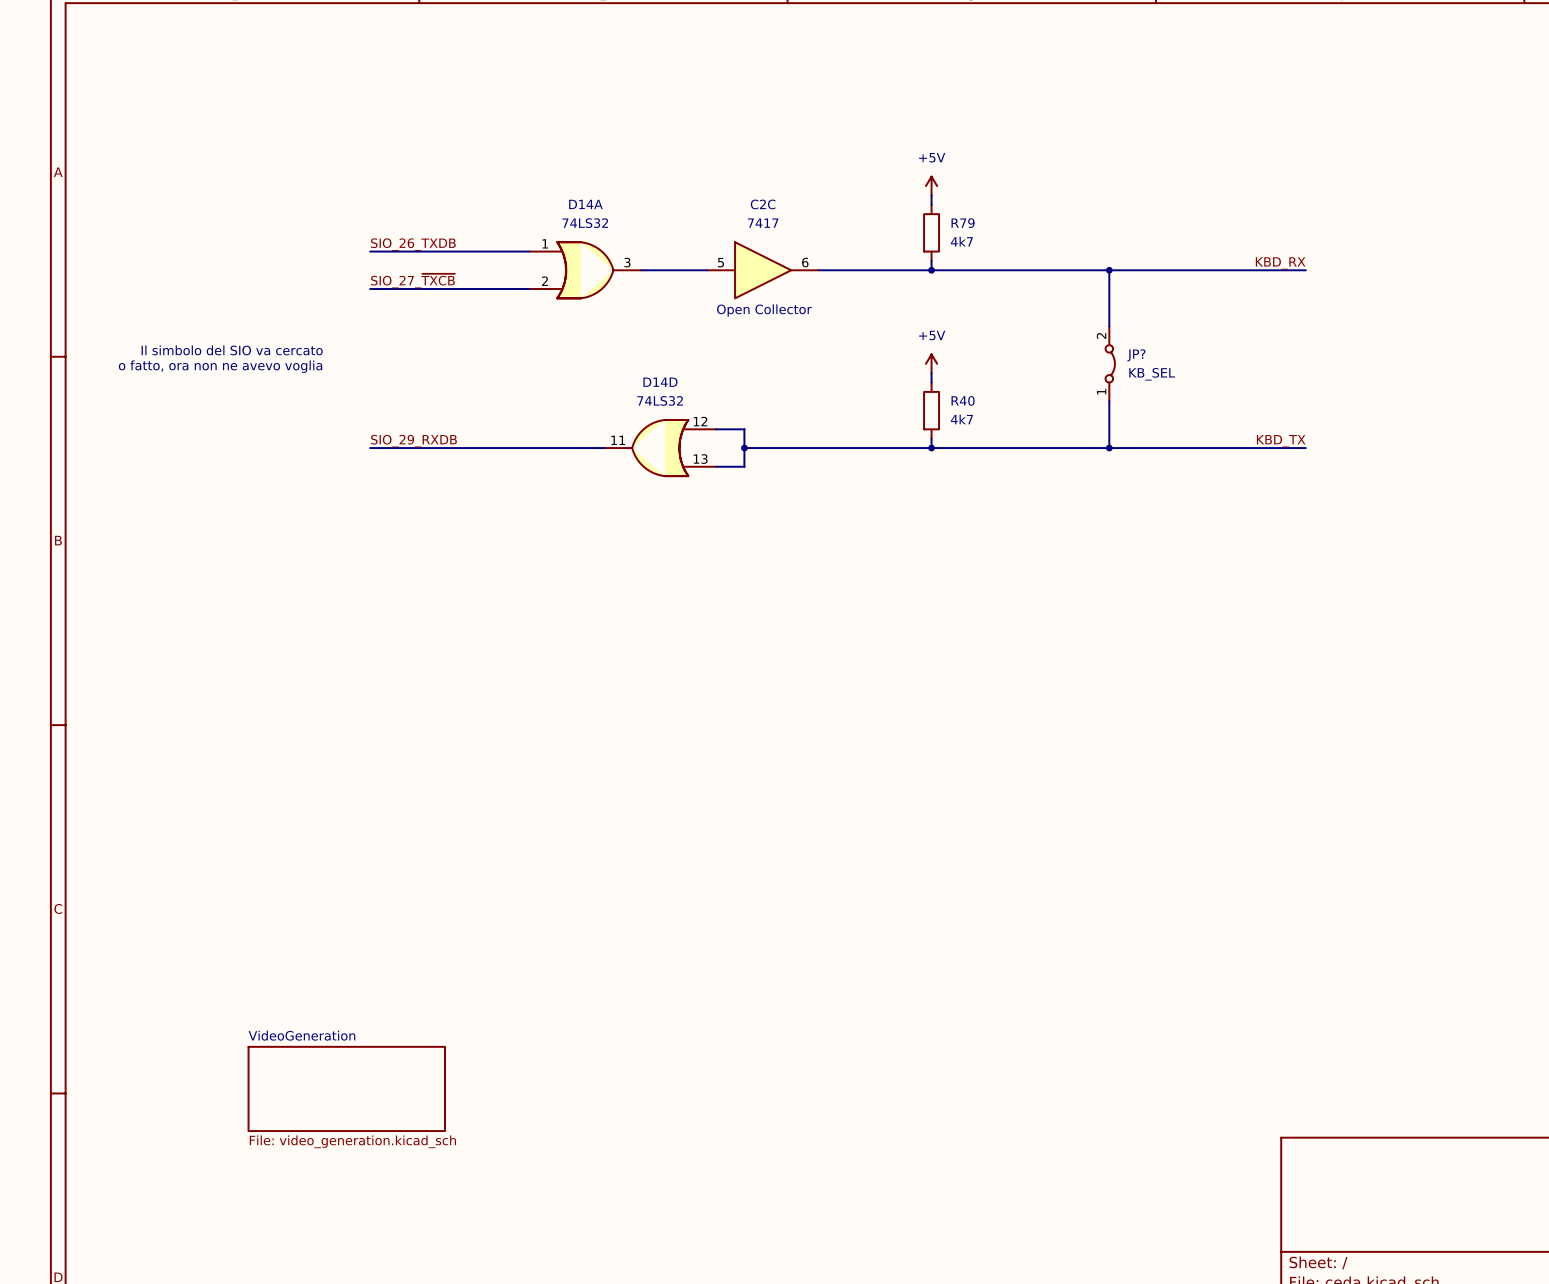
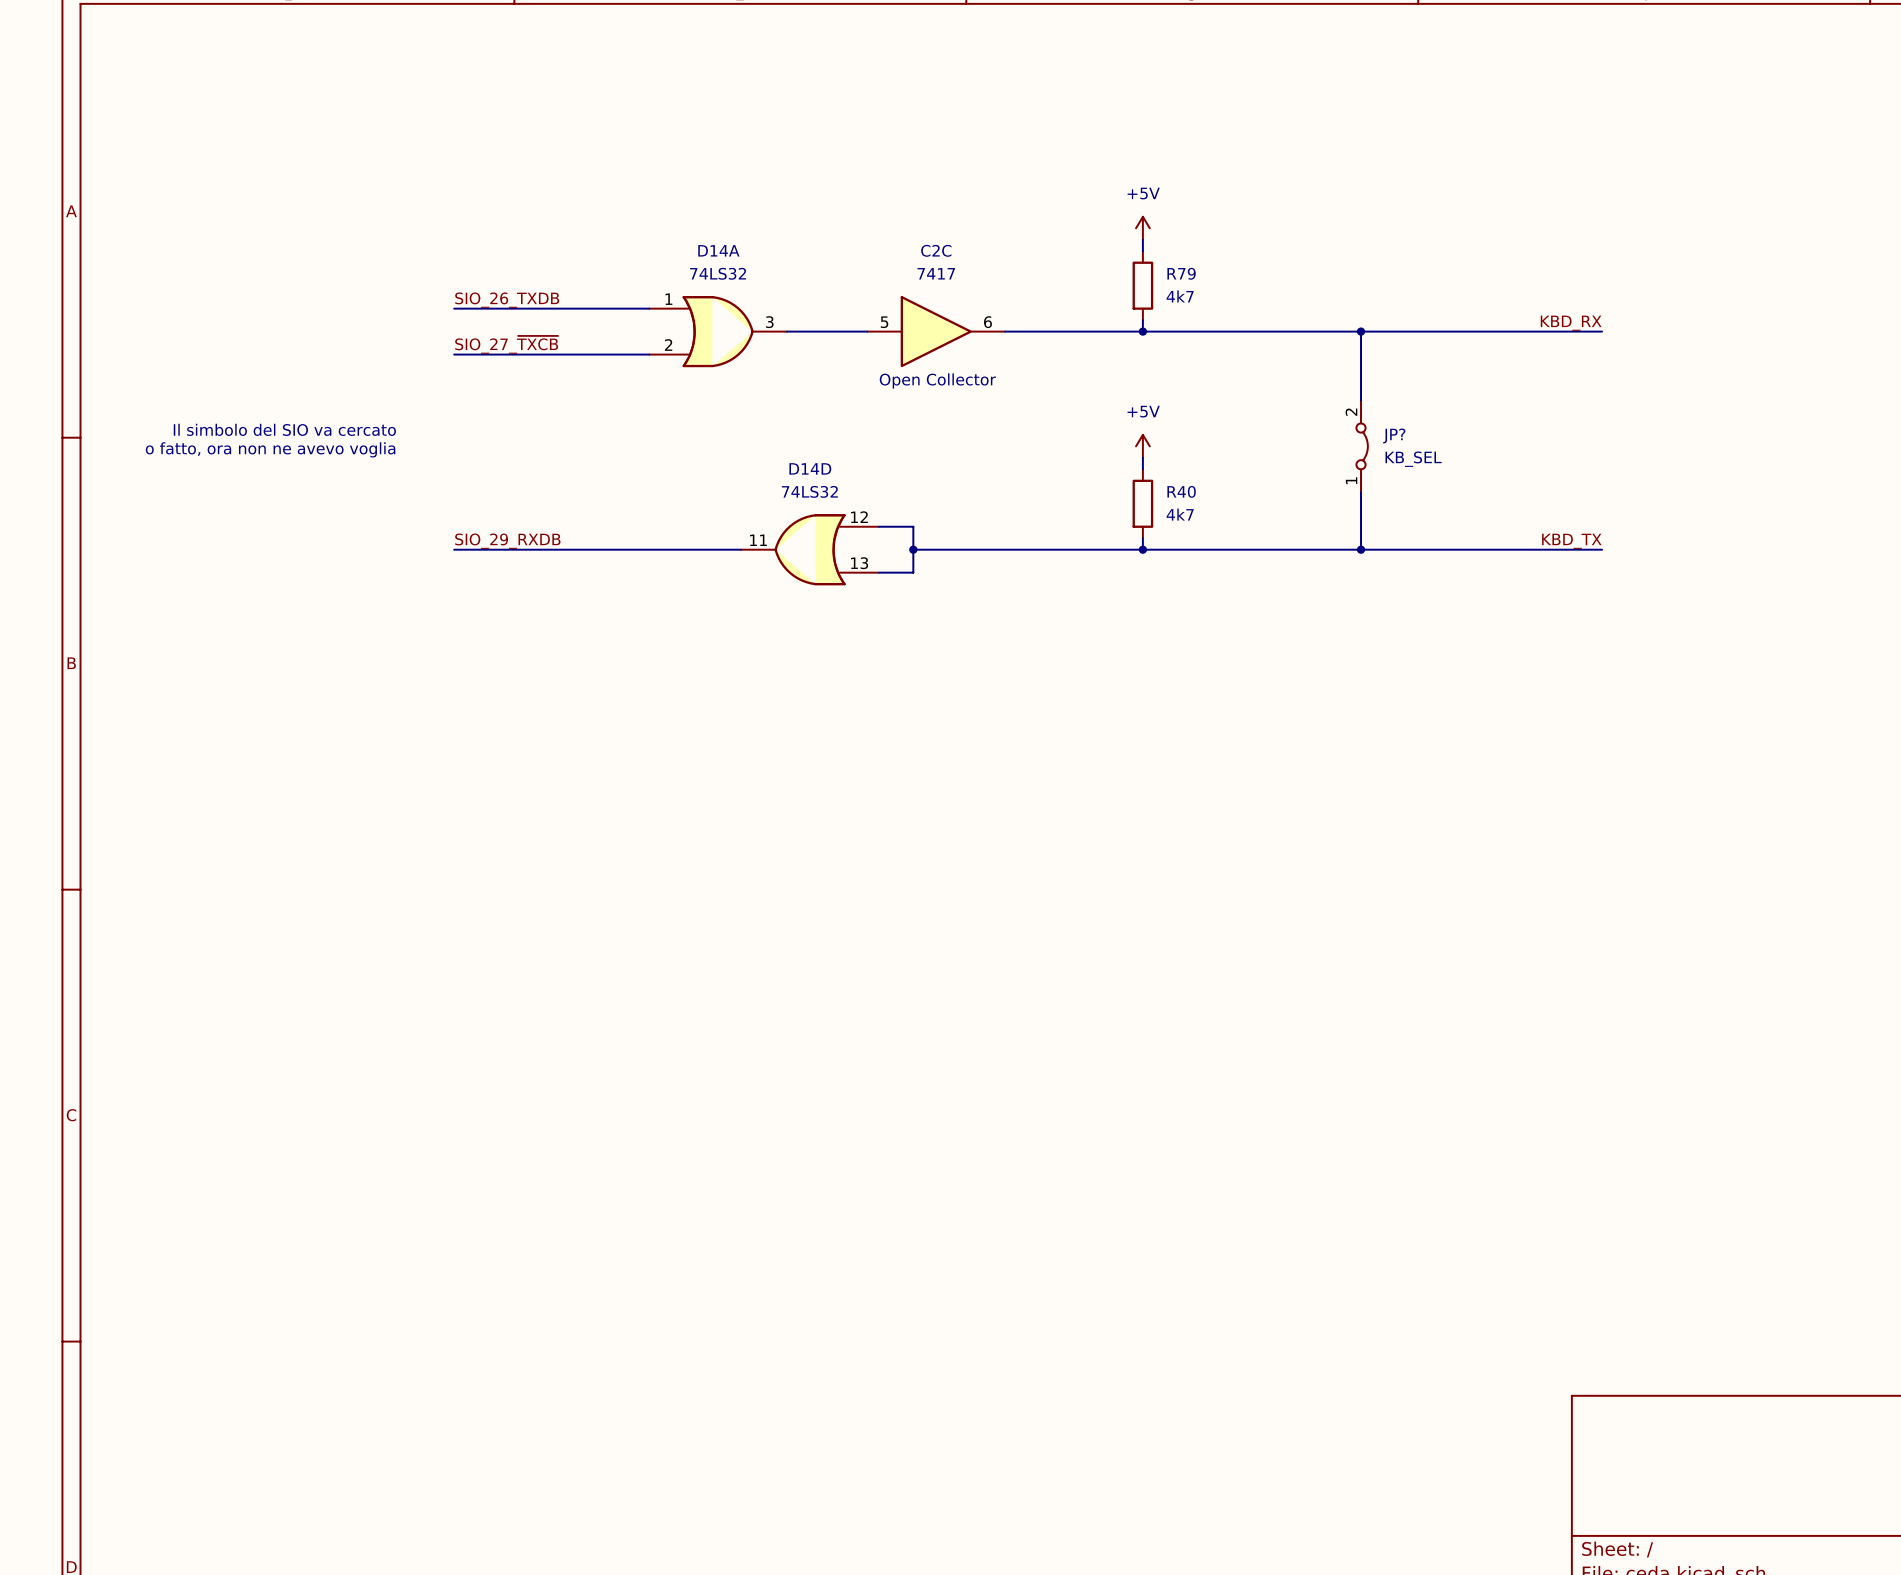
sheet VideoGeneration: File: video_generation.kicad_sch (346, 1088) -> none

